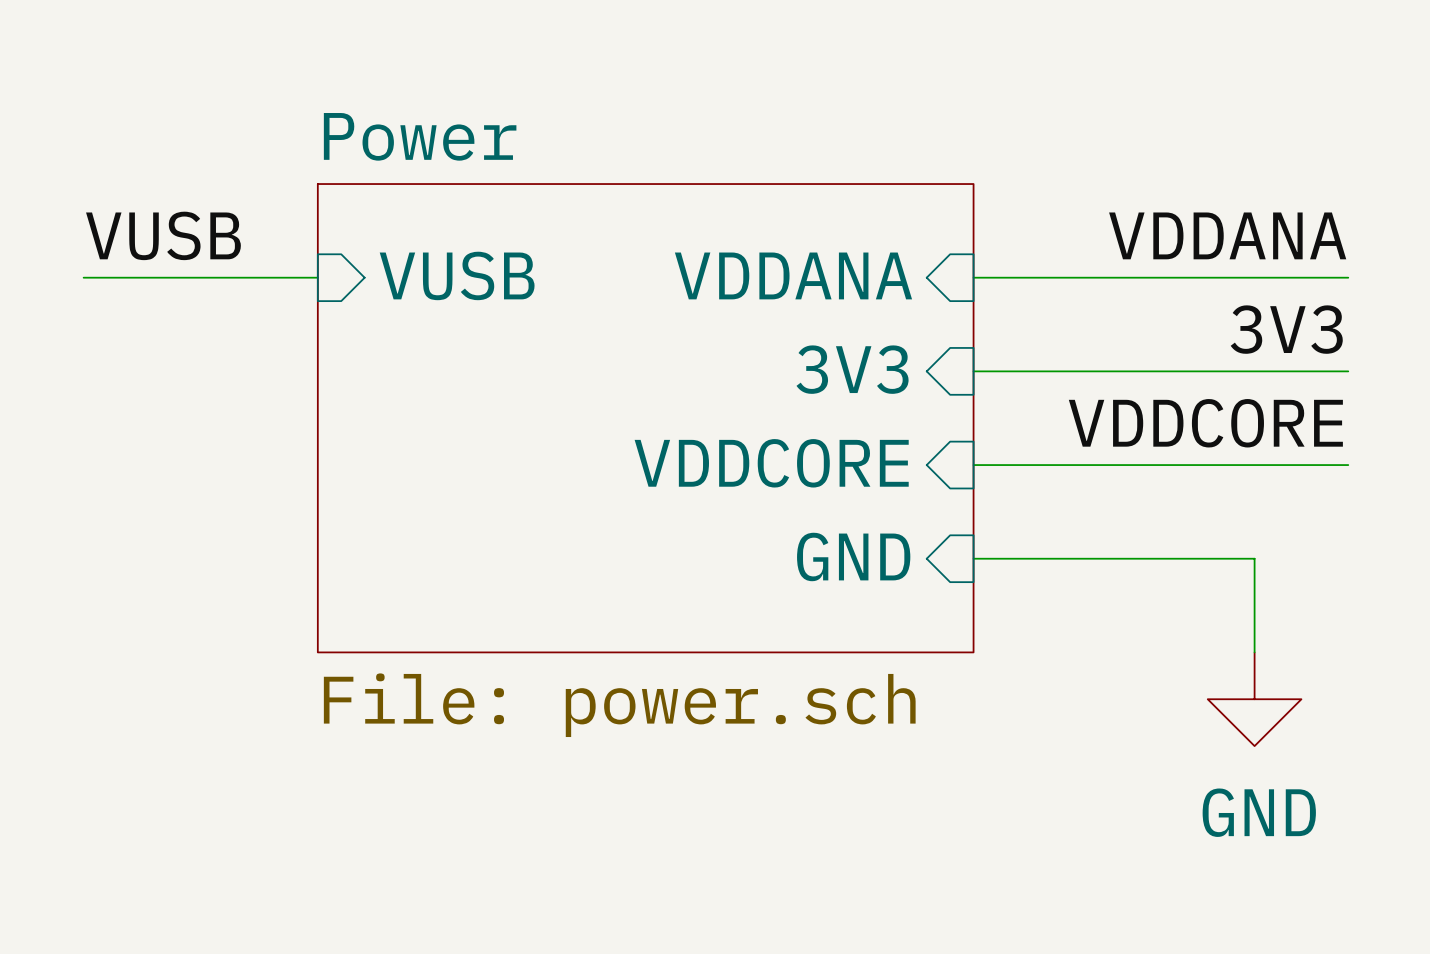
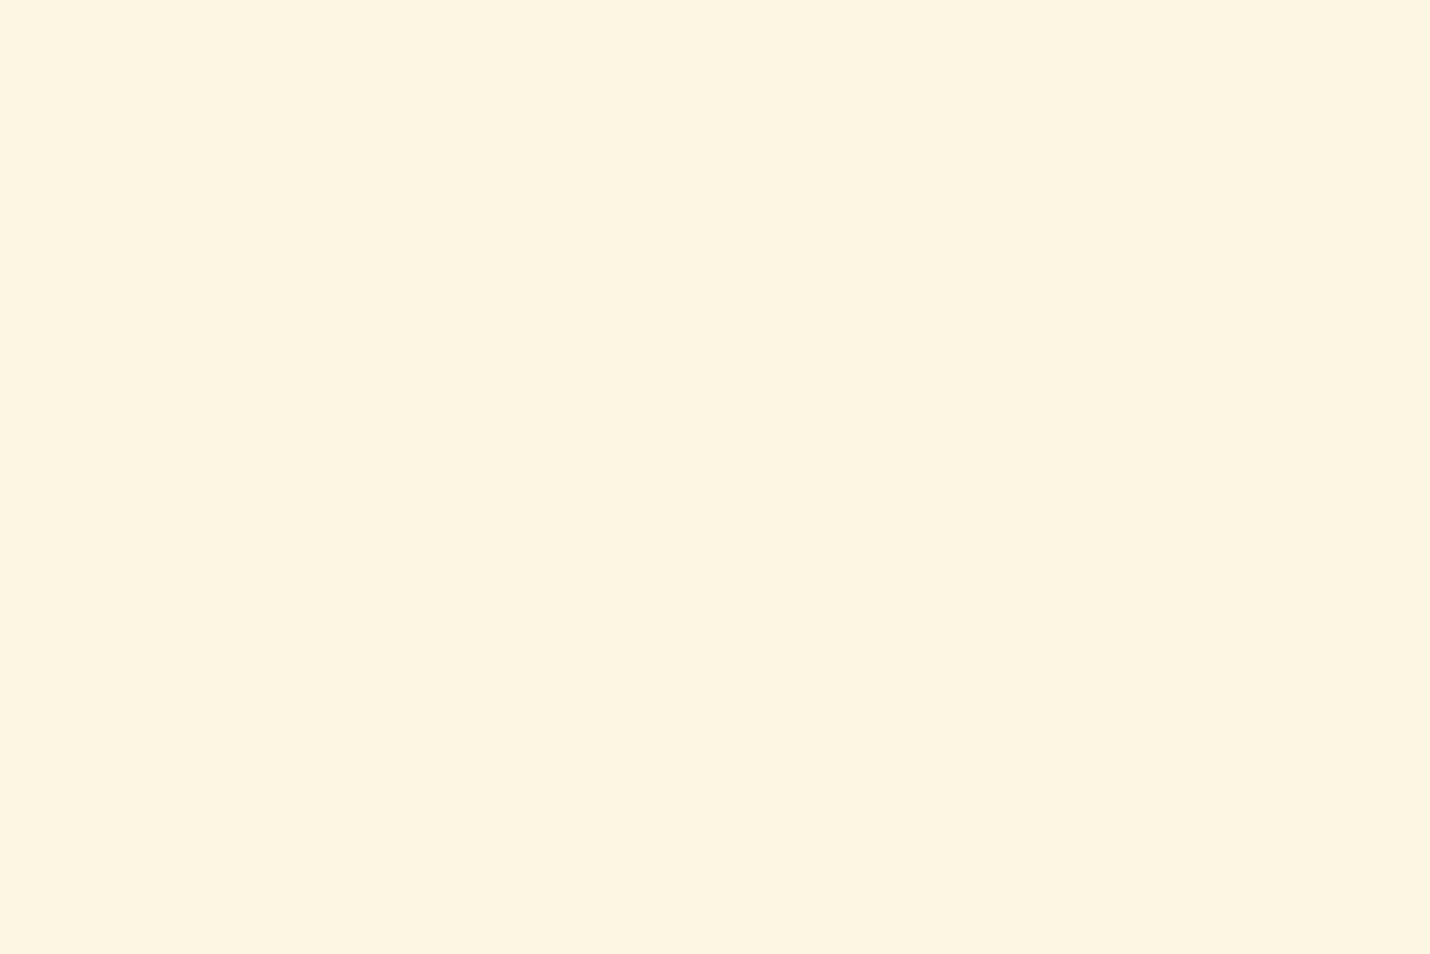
label: VUSB (163, 235) -> none
label: VDDANA (1227, 235) -> none
sheet pin: VUSB (457, 275) -> none
sheet pin: VDDANA (793, 275) -> none
wire: (83, 277) (317, 277) -> none
wire: (973, 277) (1348, 277) -> none
label: 3V3 (1286, 329) -> none
sheet pin: 3V3 (852, 369) -> none
wire: (973, 371) (1348, 371) -> none
sheet Power: File: power.sch (645, 418) -> none
label: VDDCORE (1205, 423) -> none
sheet pin: VDDCORE (771, 463) -> none
wire: (973, 465) (1348, 465) -> none
sheet pin: GND (853, 556) -> none
wire: (973, 558) (1254, 558) (1254, 652) -> none
power symbol: GND (1254, 699) -> none

